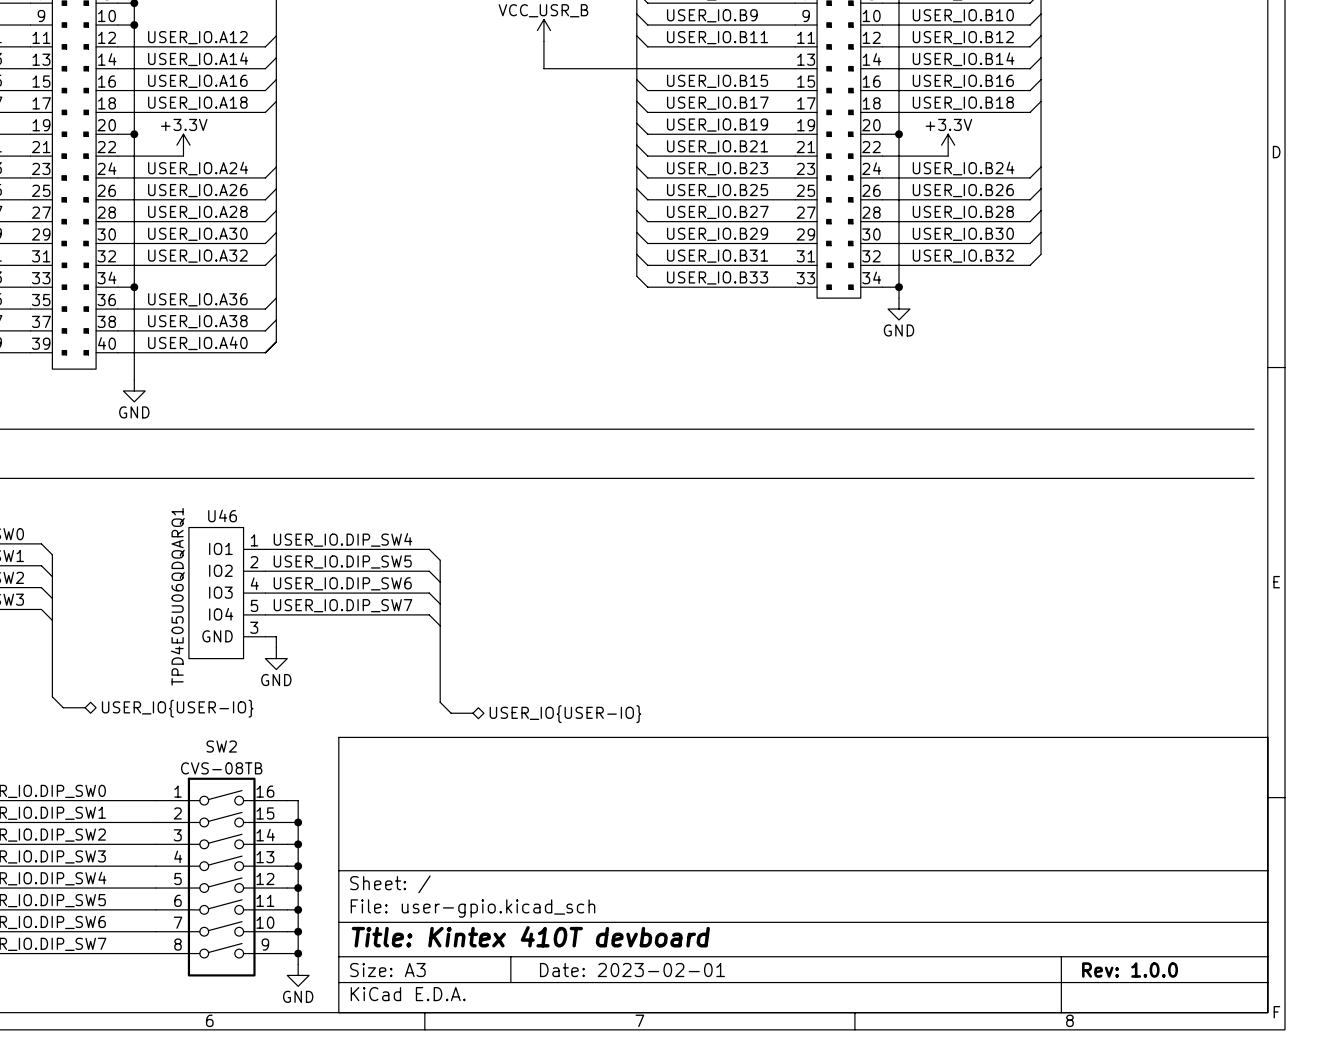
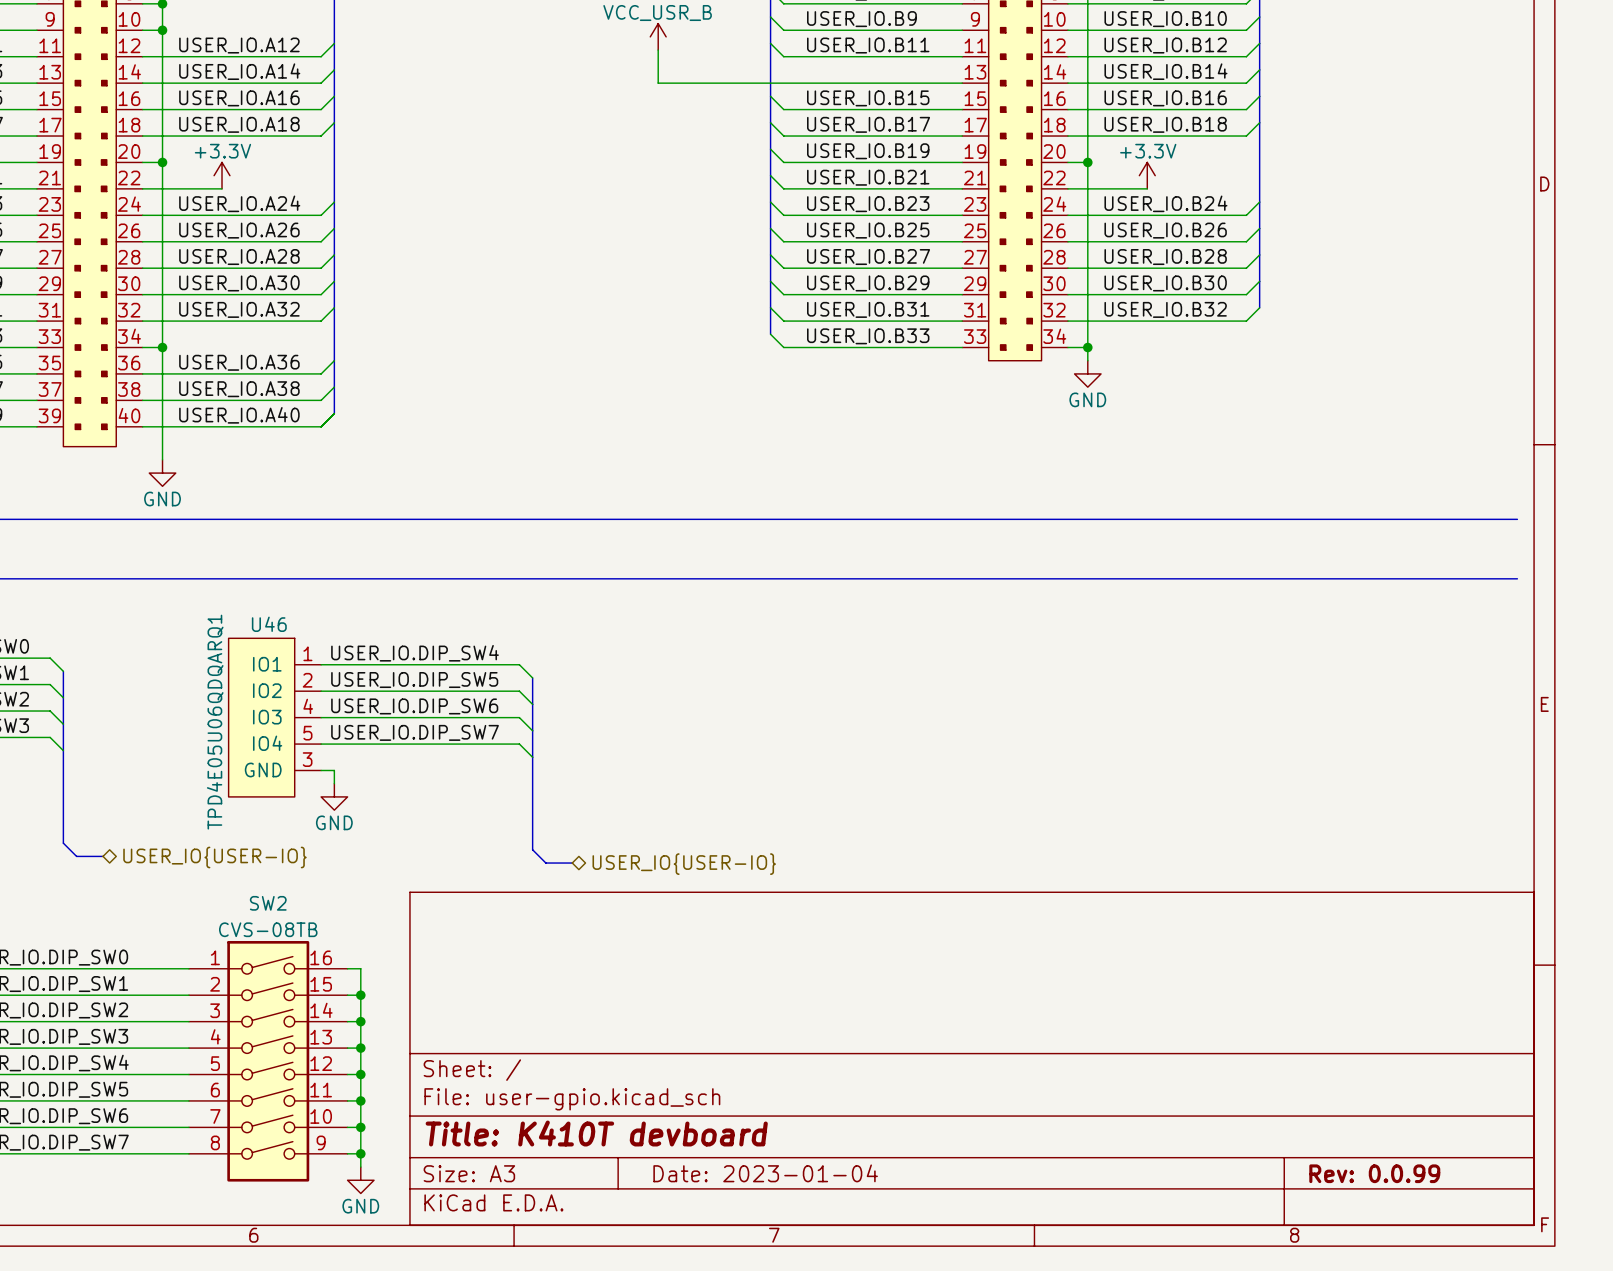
title block: Title: Kintex 410T devboard (530, 936) -> Title: K410T devboard (596, 1133)
title block: Date: 2023-02-01 (632, 970) -> Date: 2023-01-04 (765, 1173)
title block: Rev: 1.0.0 (1130, 970) -> Rev: 0.0.99 (1374, 1173)

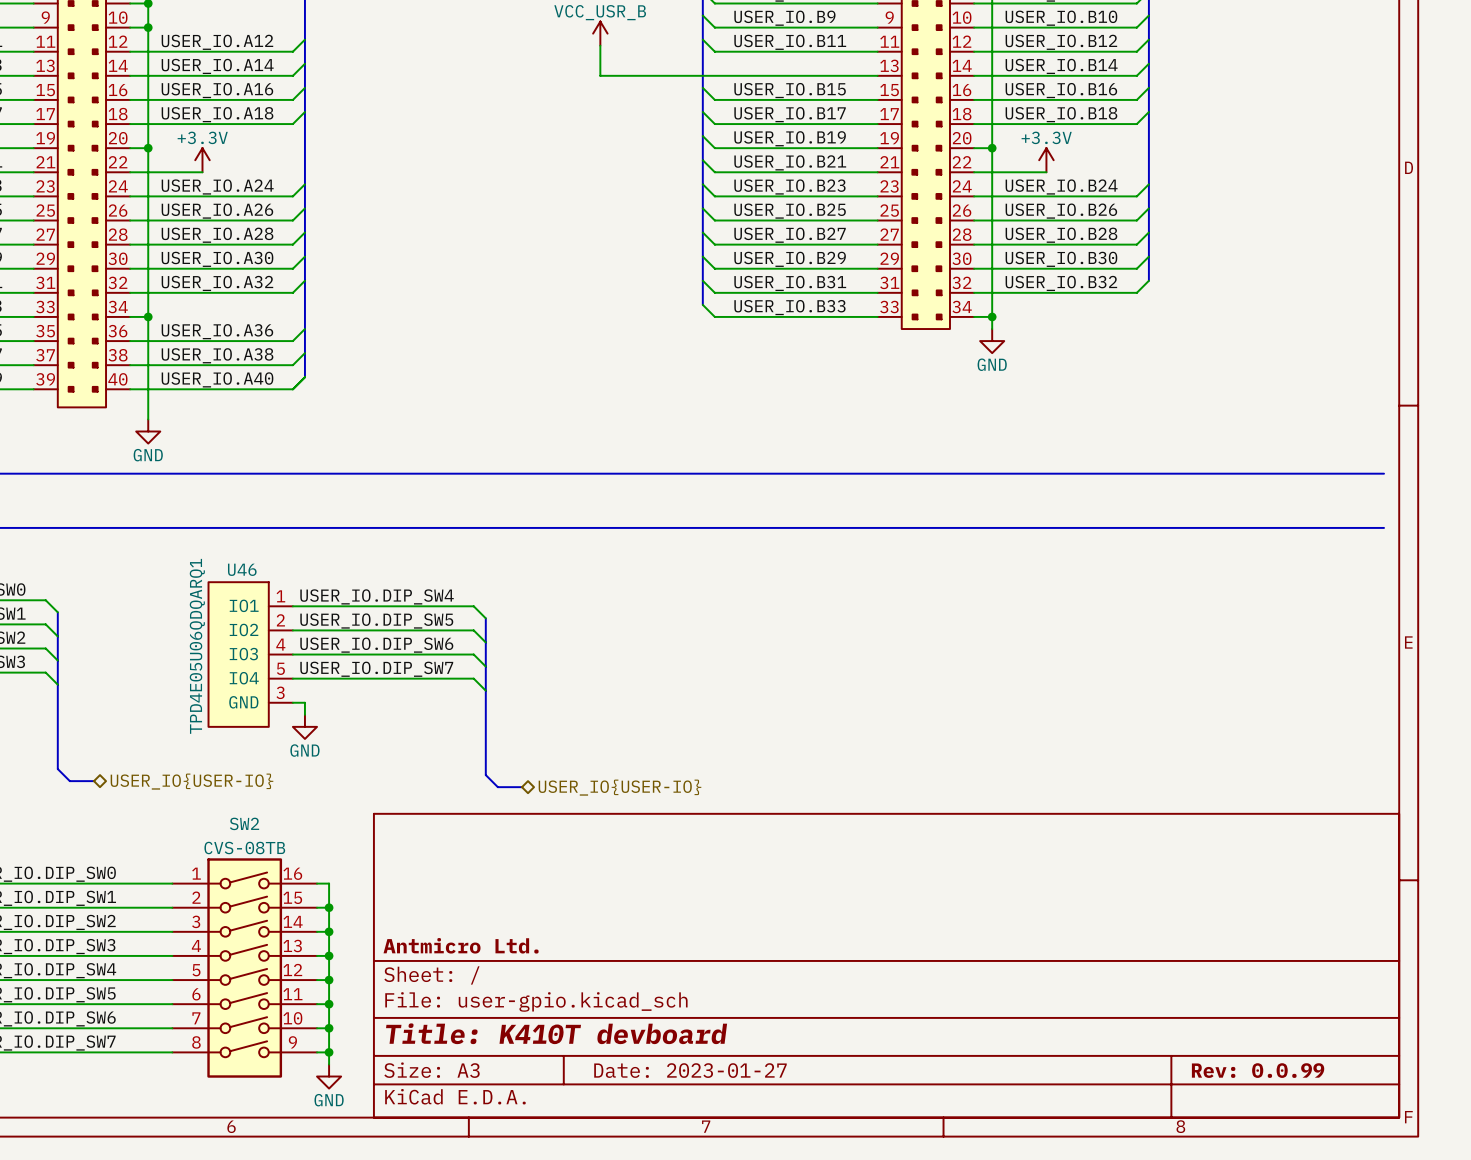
title block: none -> Antmicro Ltd. (461, 945)
title block: Date: 2023-01-04 (765, 1173) -> Date: 2023-01-27 (690, 1070)

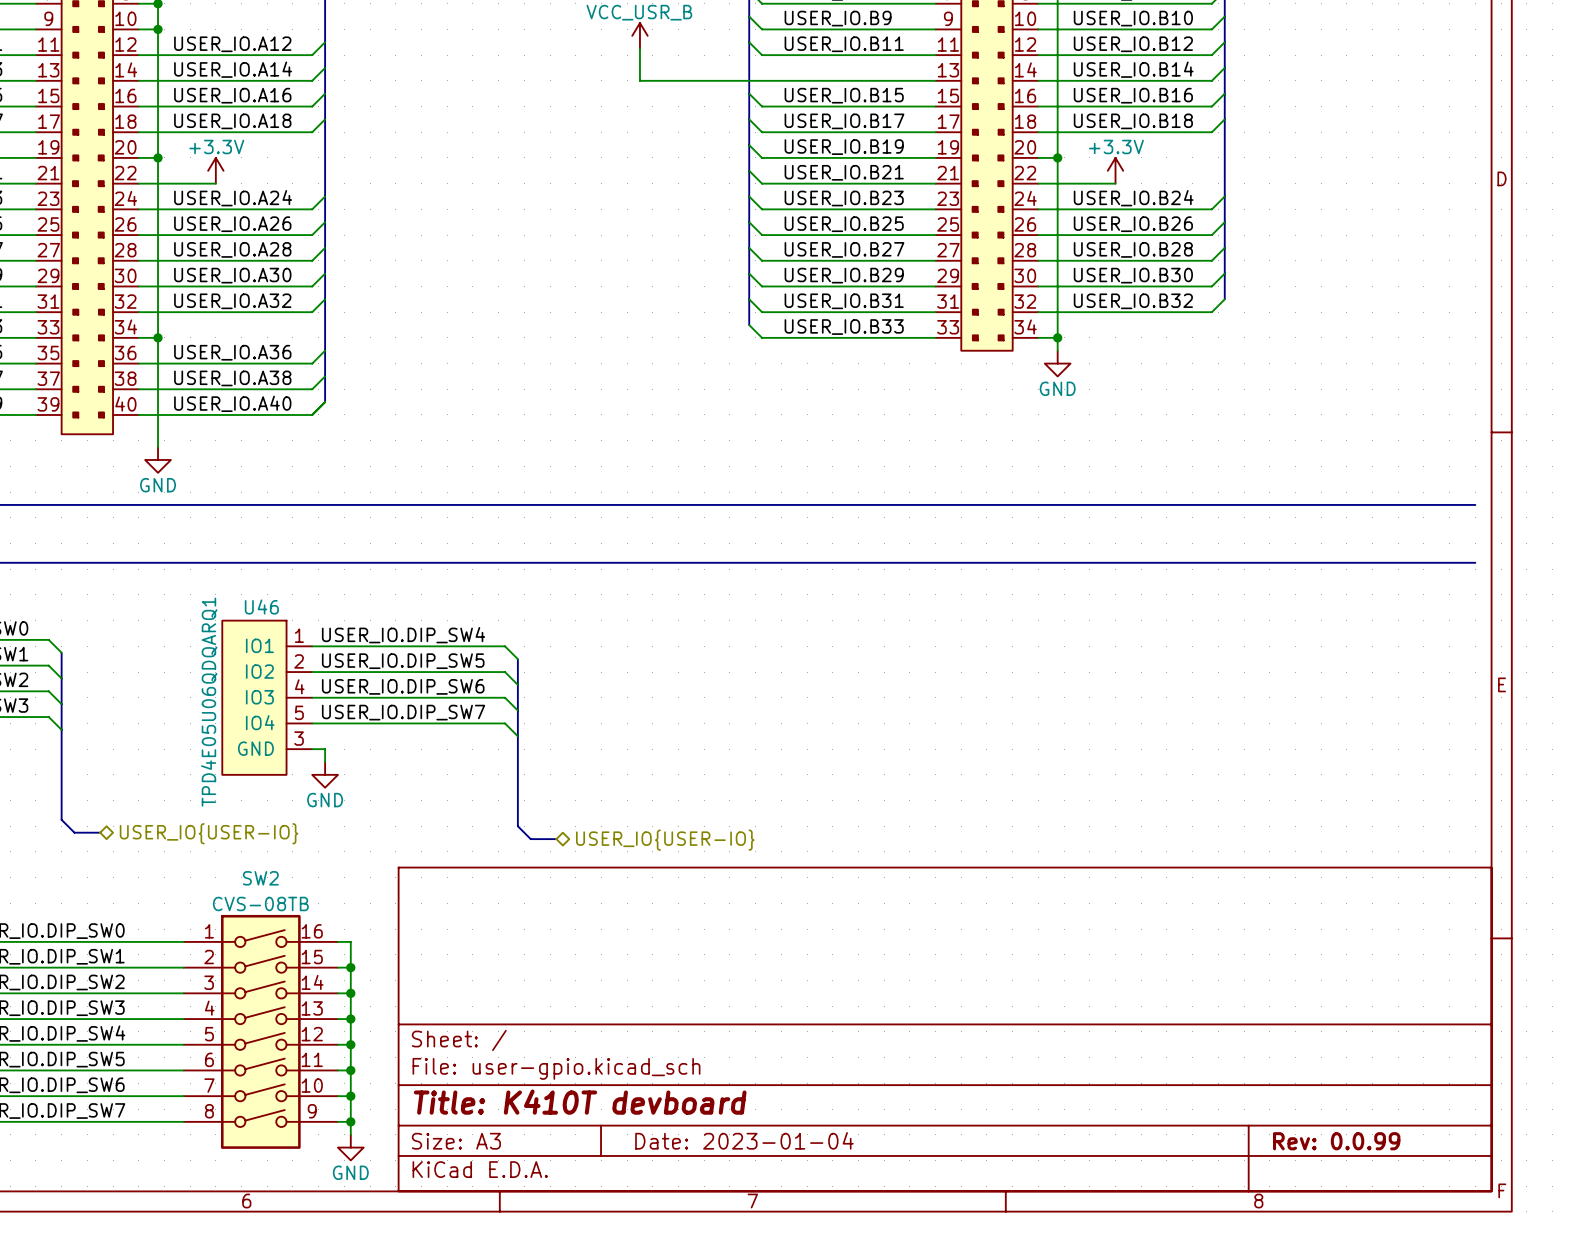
title block: Antmicro Ltd. (461, 945) -> none
title block: Date: 2023-01-27 (690, 1070) -> Date: 2023-01-04 (744, 1140)

